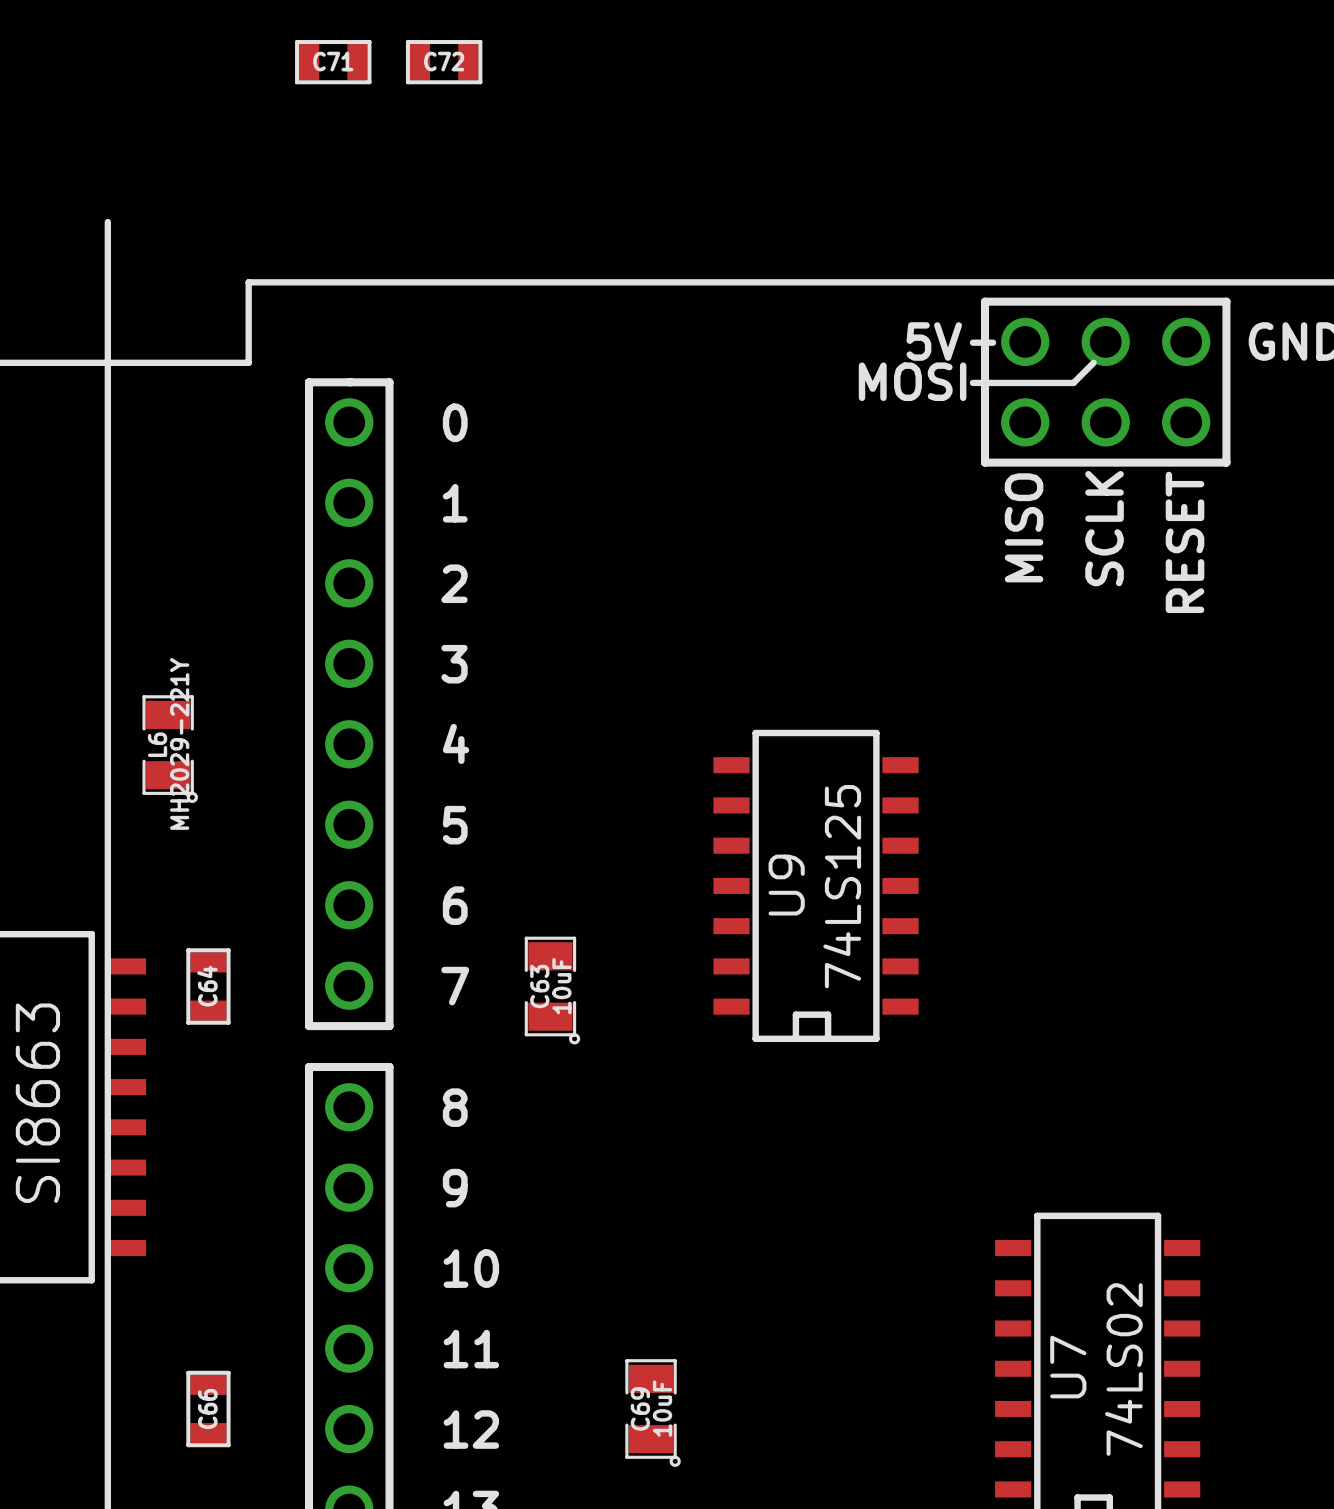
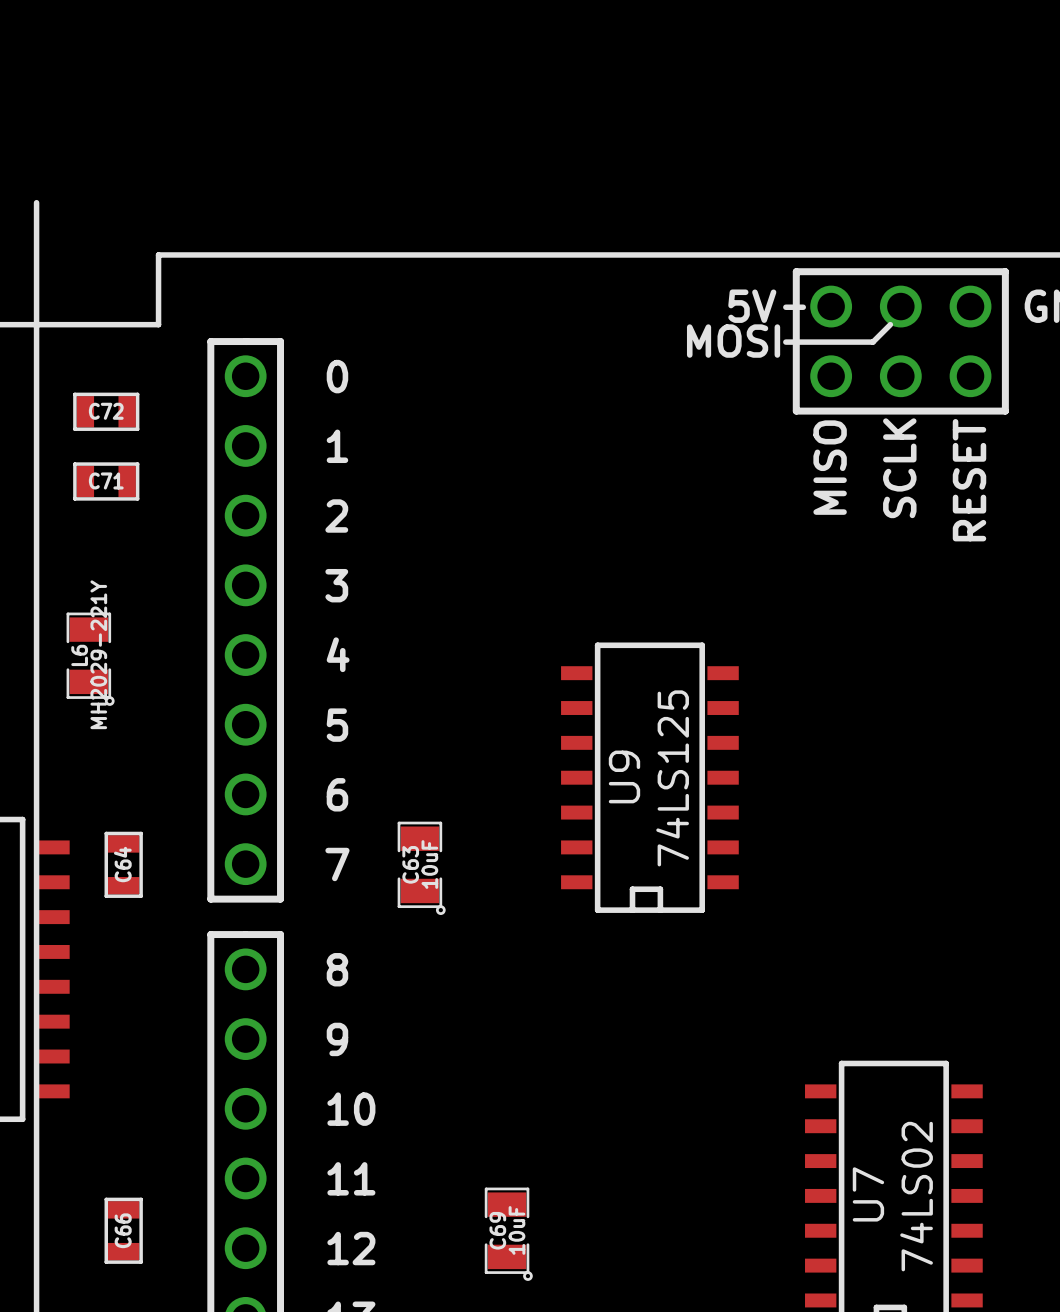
C71 position: (333, 62) -> (106, 481)
C72 position: (444, 62) -> (106, 411)

